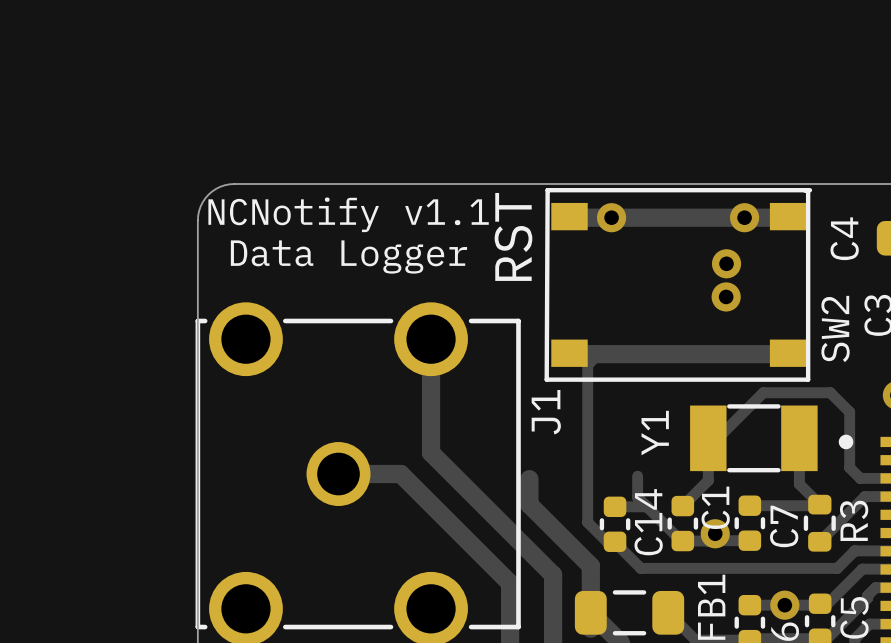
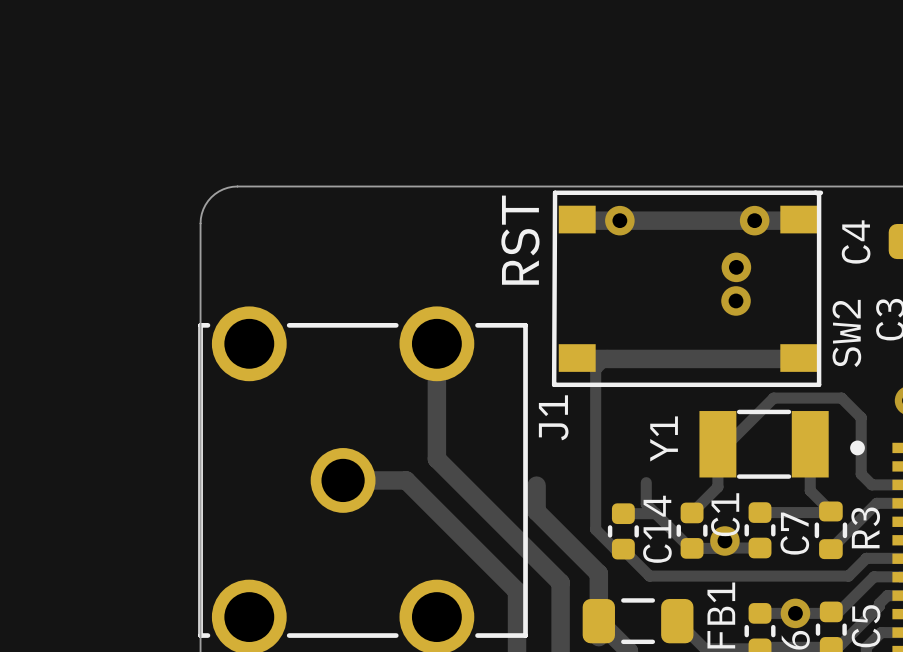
text: NCNotify v1.1 (348, 214) -> none
text: Data Logger (348, 257) -> none

